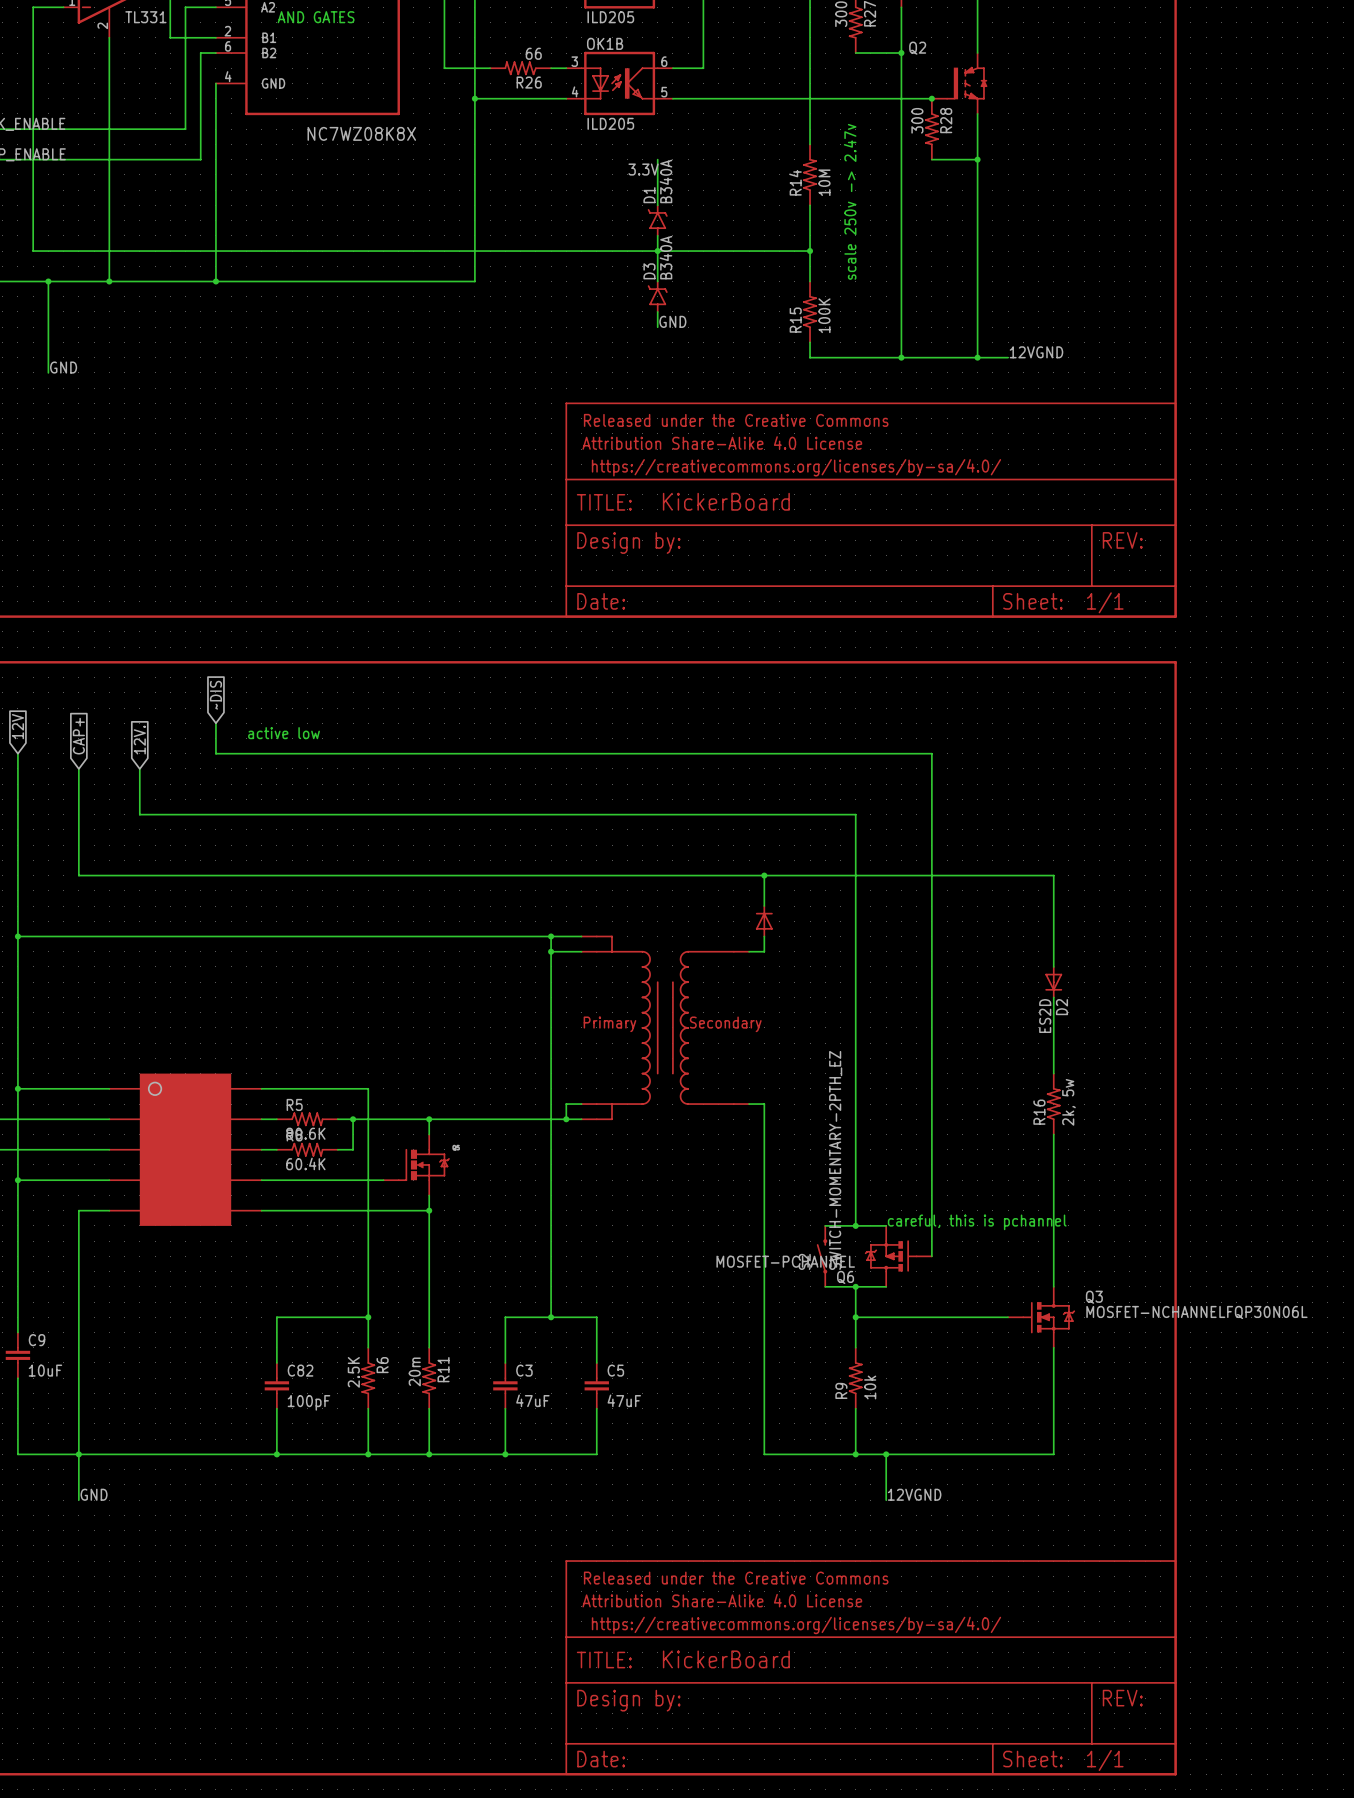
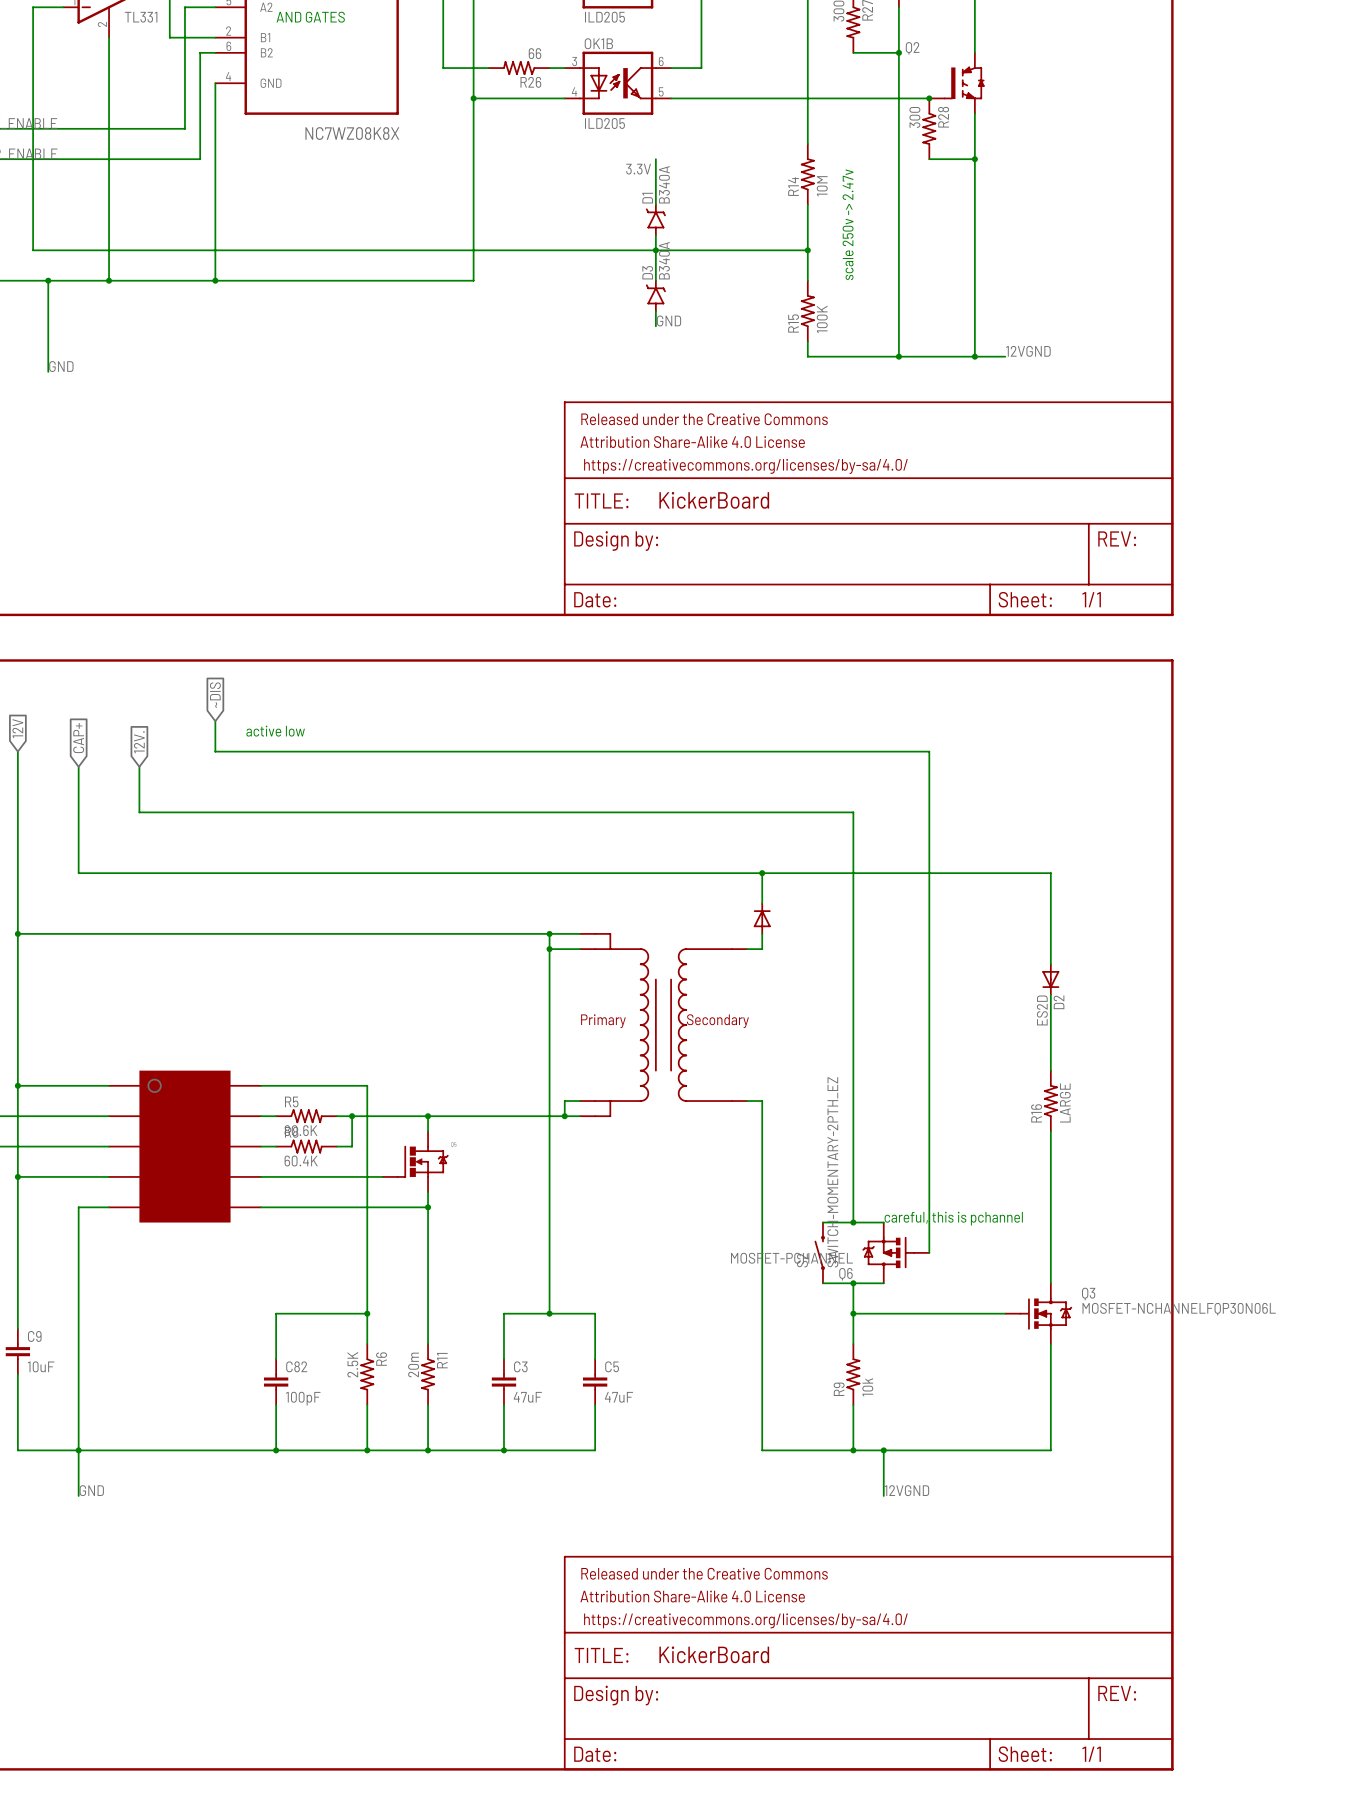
R16 value: 2k, 5w (1068, 1102) -> LARGE (1065, 1103)

